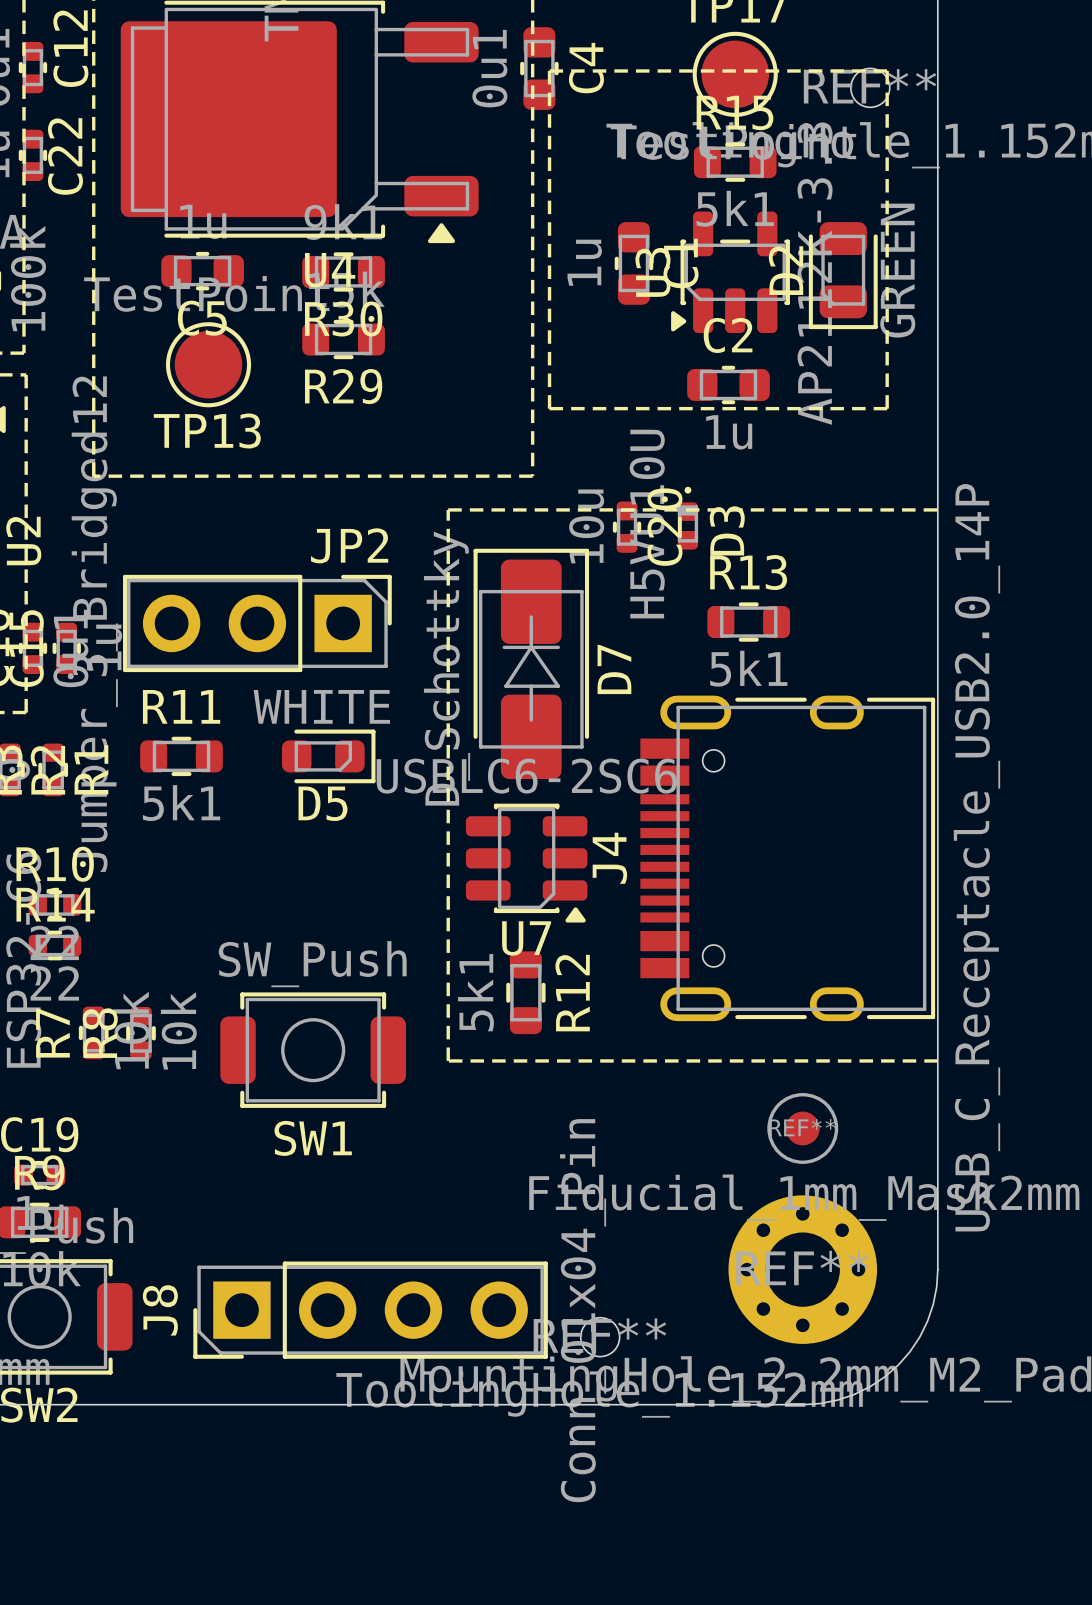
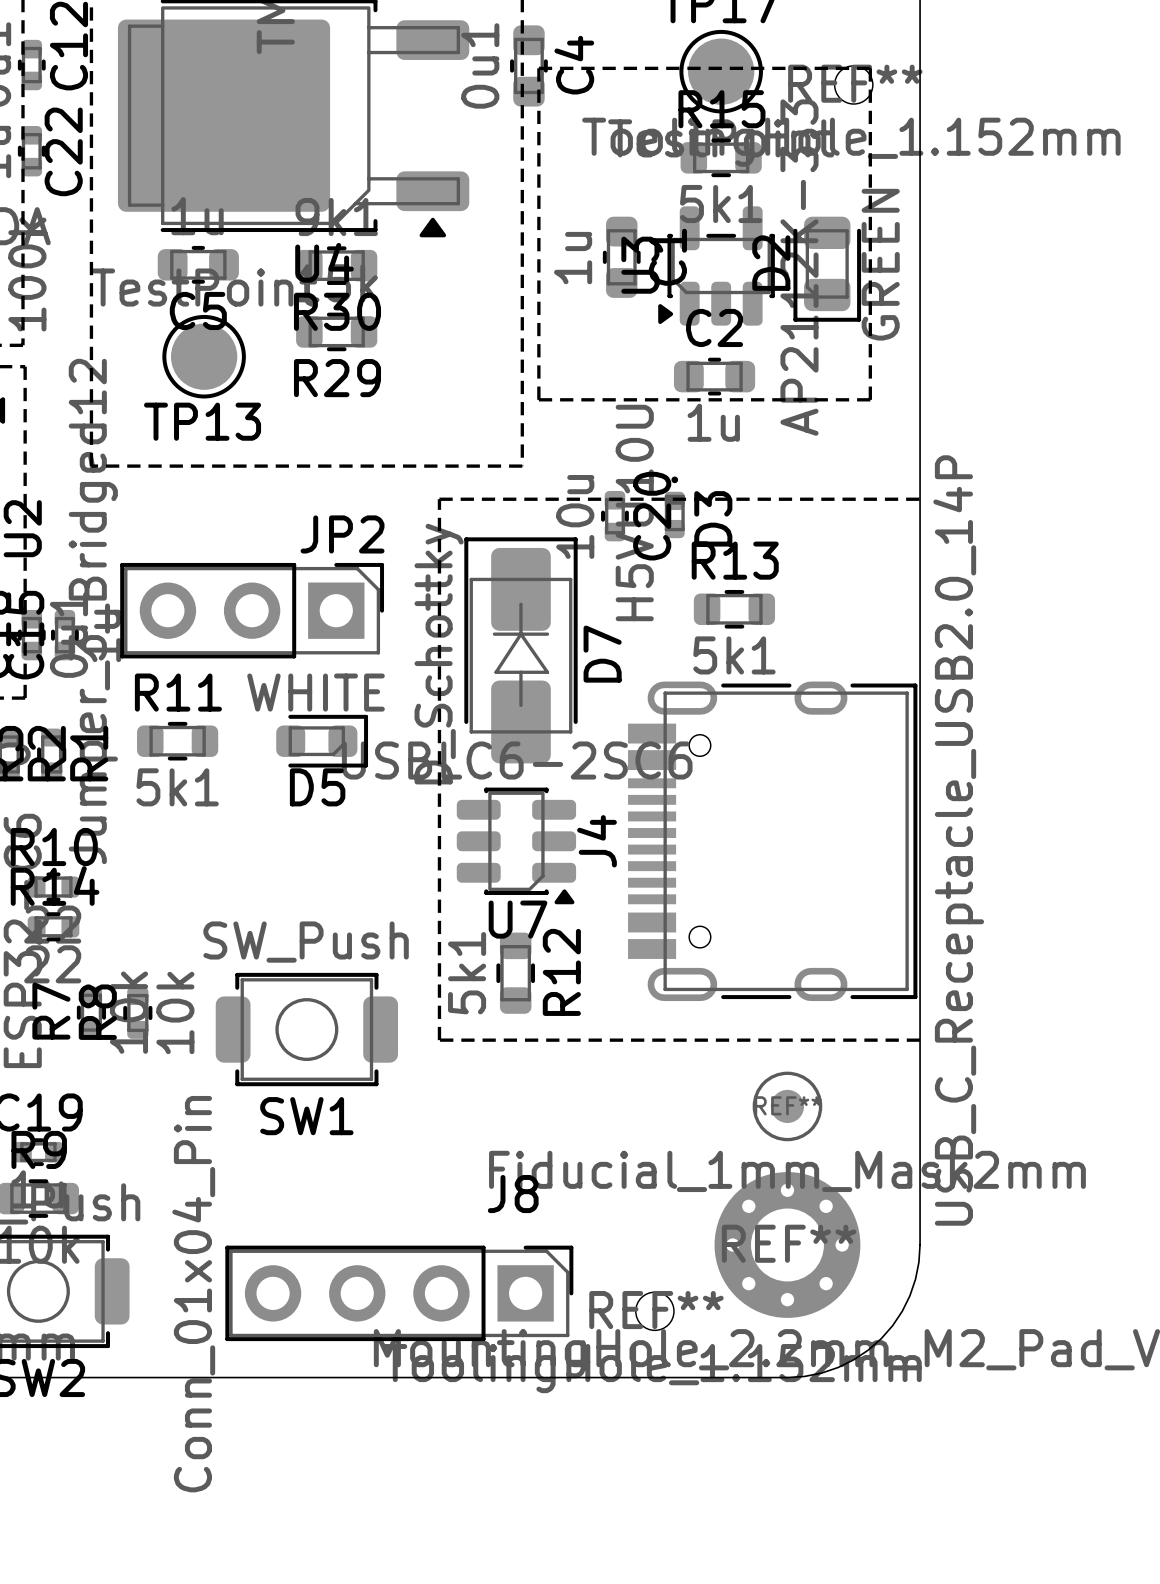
J8 name position: J8 (160, 1310) -> J8 (513, 1194)
J8 rotation: 0° (370, 1310) -> 180° (399, 1293)
REF** position: (600, 1337) -> (654, 1311)

